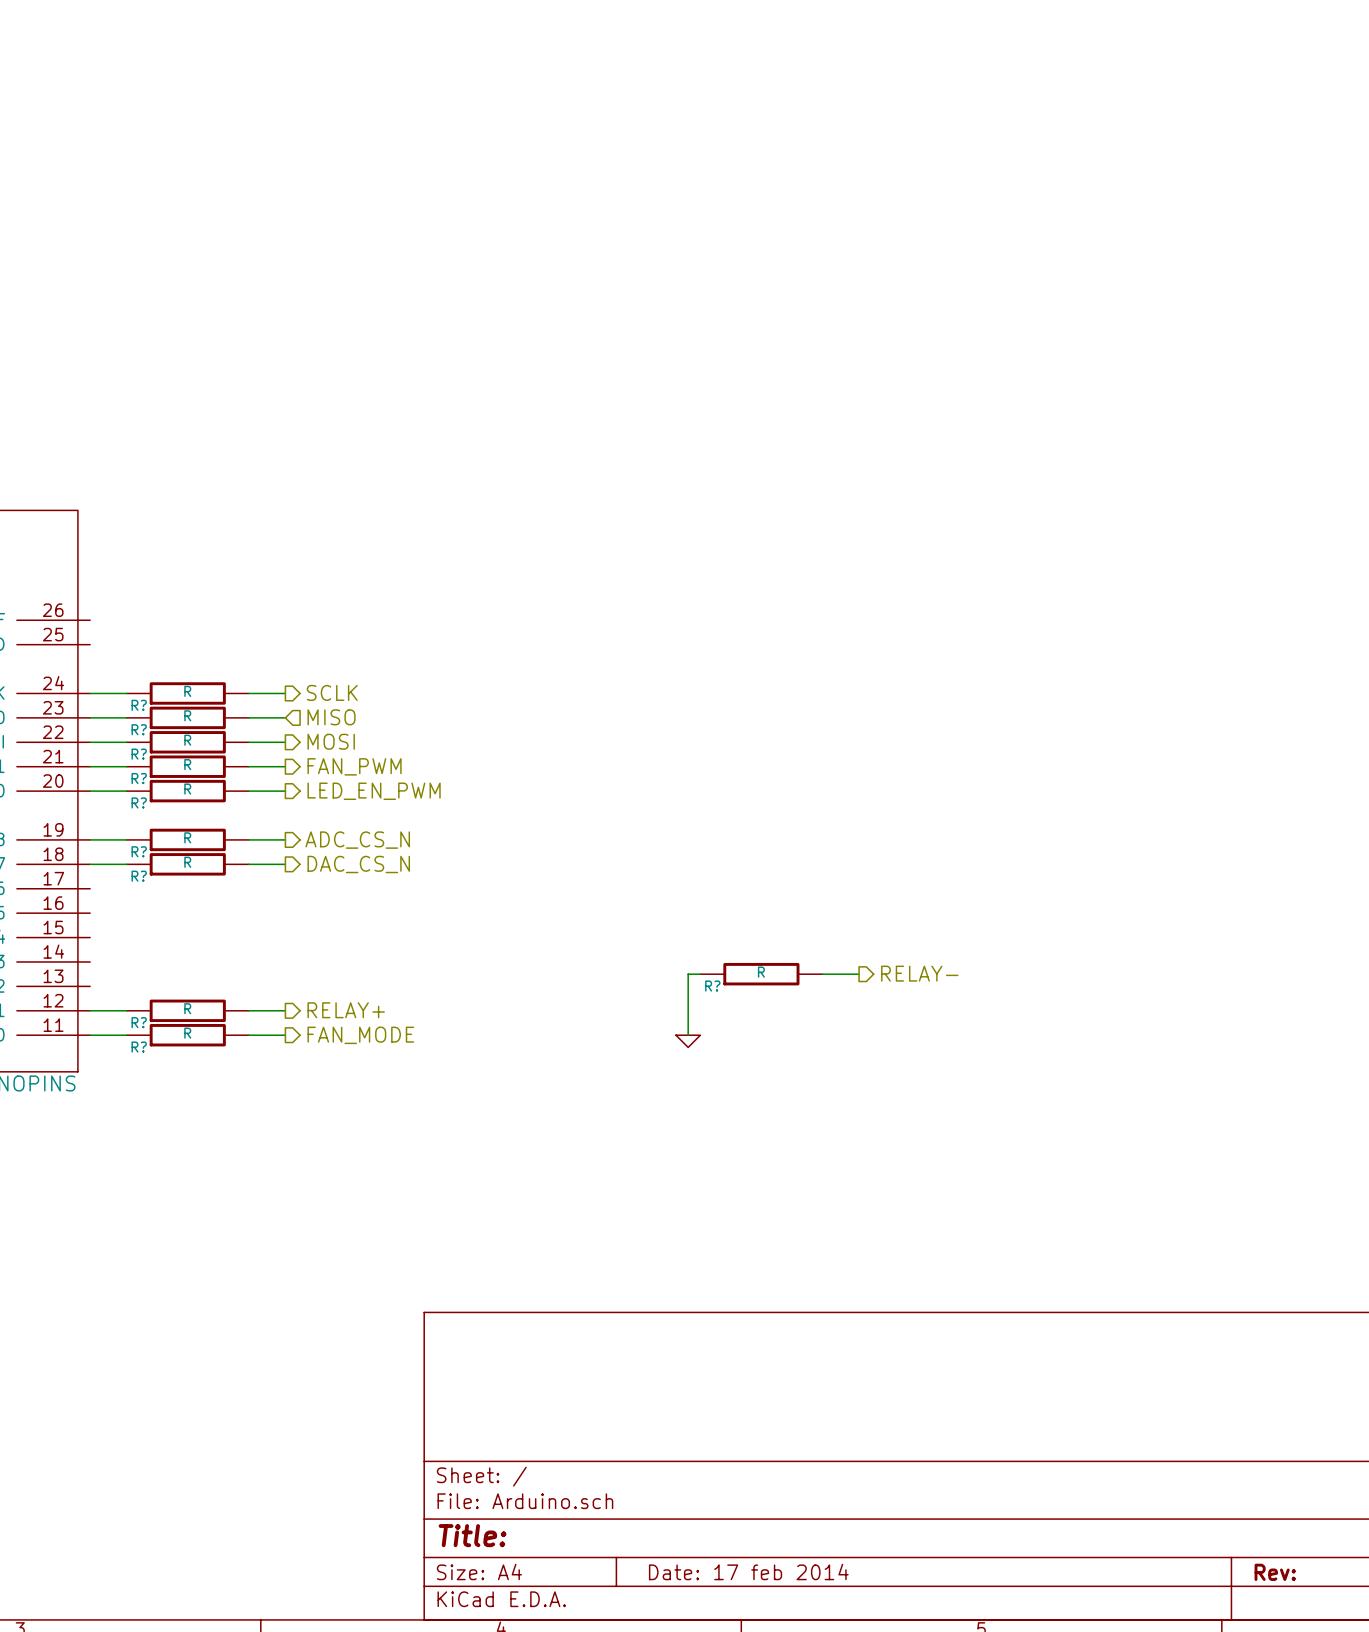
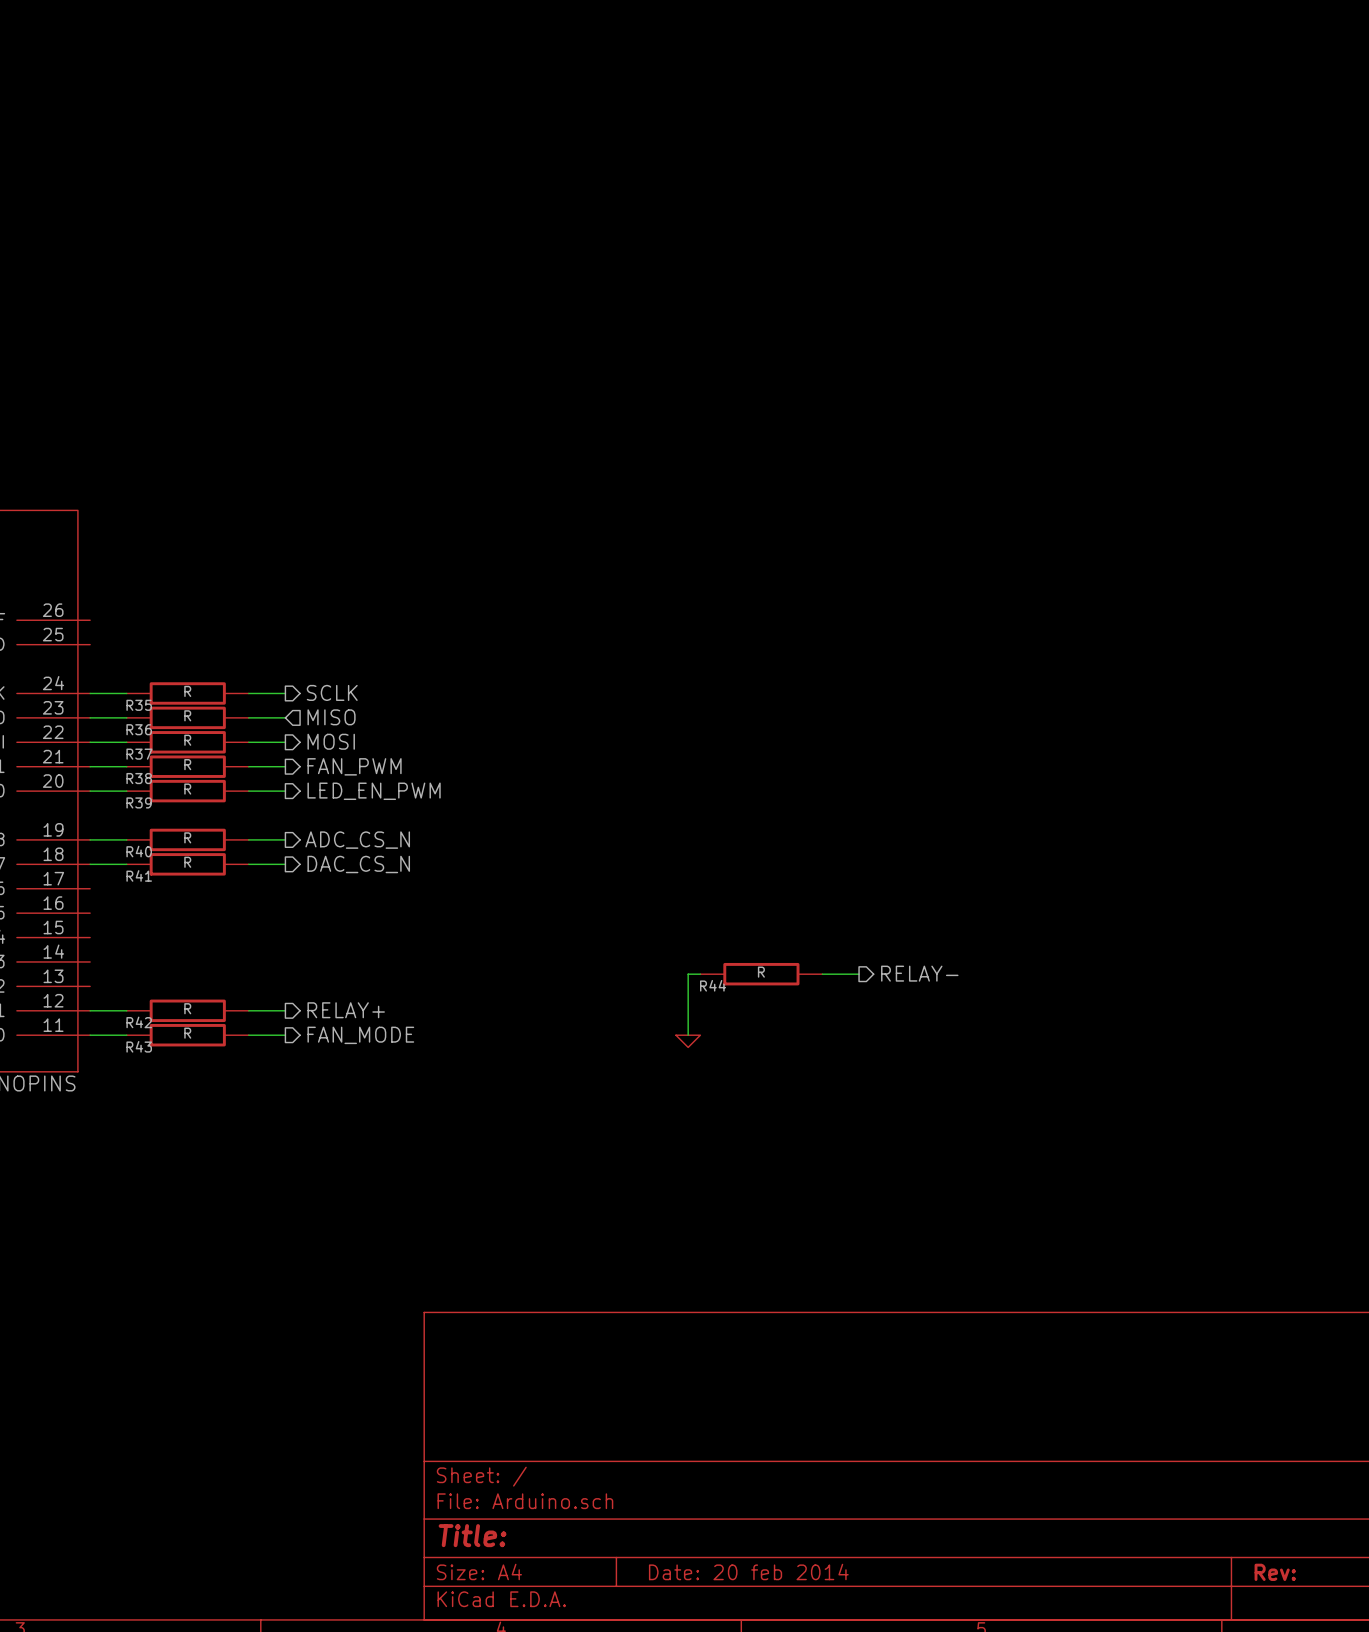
R? name: R? (139, 705) -> R35 (139, 705)
R? name: R? (139, 729) -> R36 (139, 729)
R? name: R? (139, 754) -> R37 (139, 754)
R? name: R? (139, 778) -> R38 (139, 778)
R? name: R? (139, 802) -> R39 (139, 802)
R? name: R? (139, 851) -> R40 (139, 851)
R? name: R? (139, 876) -> R41 (139, 875)
R? name: R? (712, 986) -> R44 (713, 985)
R? name: R? (139, 1022) -> R42 (139, 1022)
R? name: R? (139, 1047) -> R43 (139, 1046)
title block: Date: 17 feb 2014 (748, 1571) -> Date: 20 feb 2014 (748, 1571)

